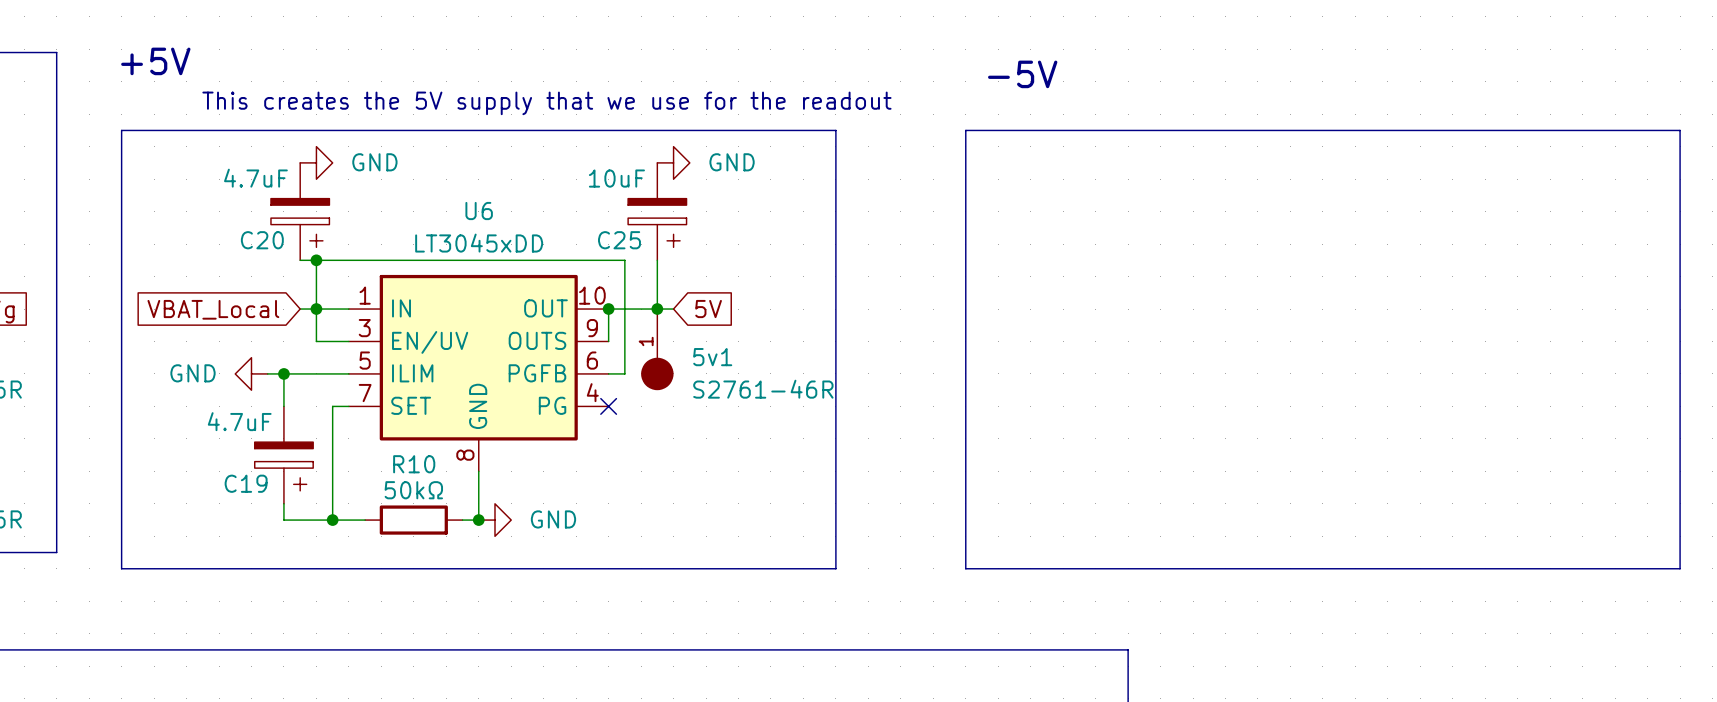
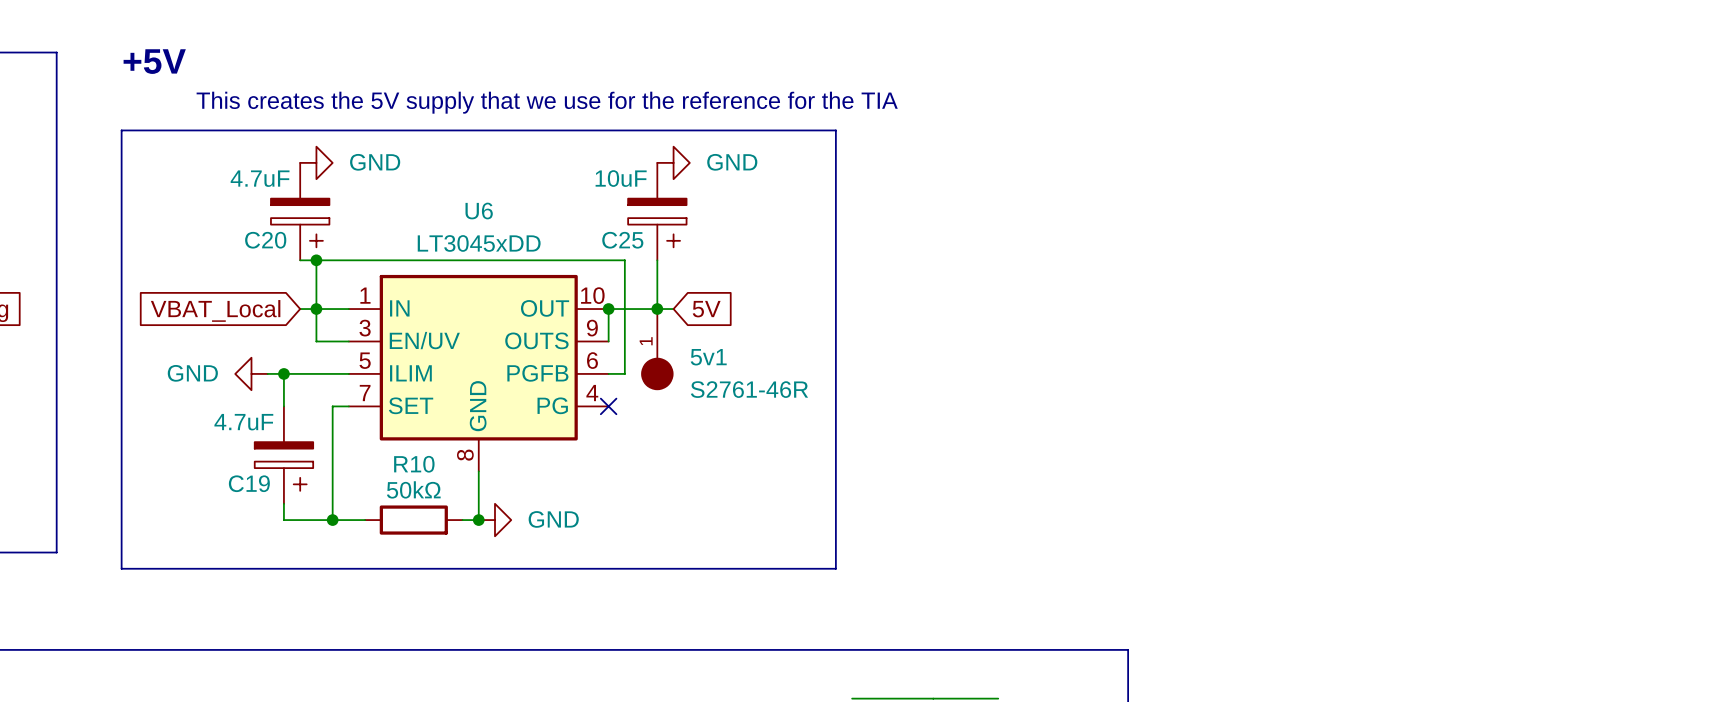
text: -5V (1022, 74) -> none
text: This creates the 5V supply that we use for the readout (546, 103) -> This creates the 5V supply that we use for the reference for the TIA (547, 102)
line: (965, 130) (1680, 130) (1680, 568) (965, 568) (965, 130) -> none
wire: none -> (852, 698) (998, 698)

